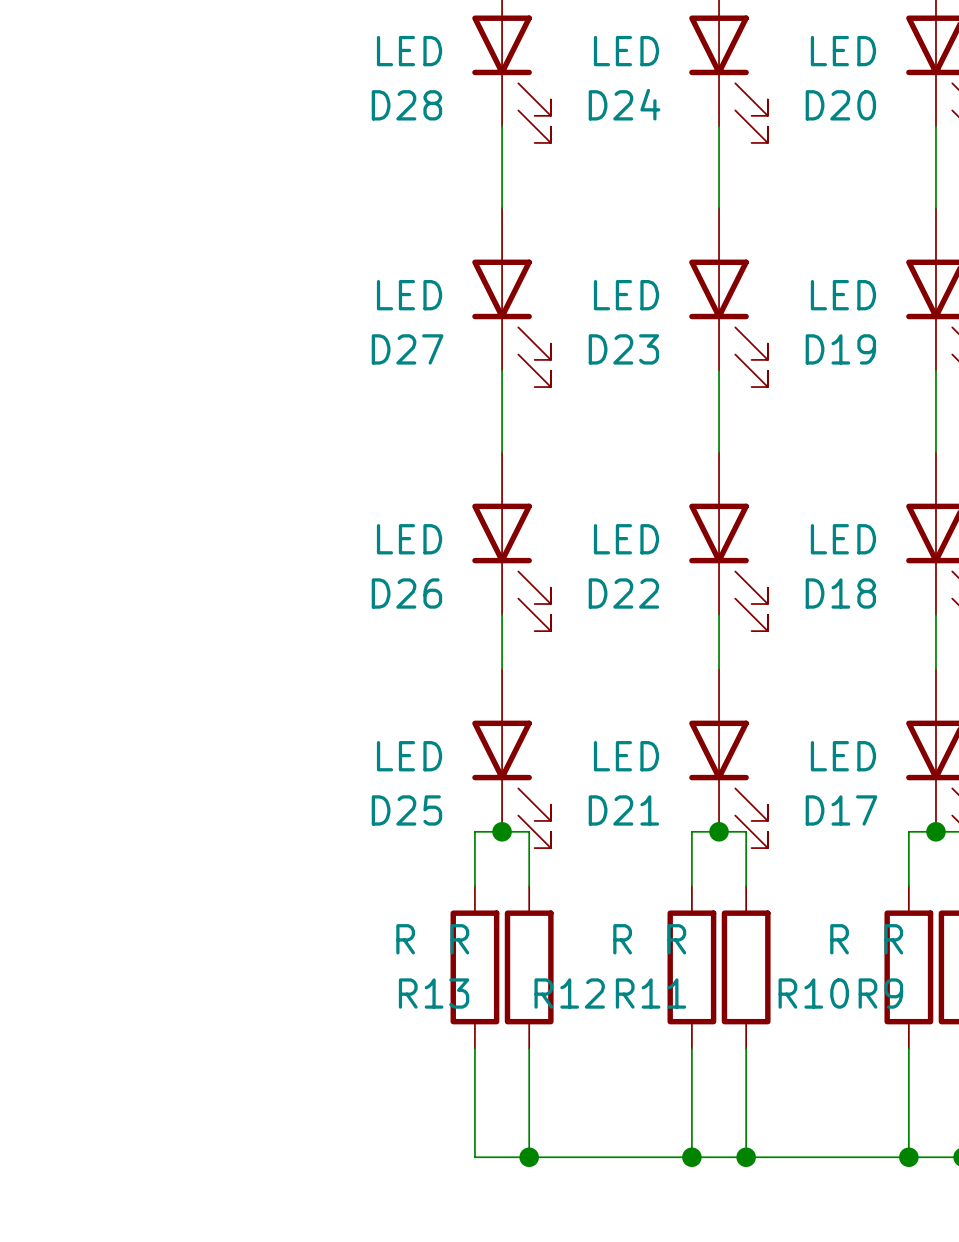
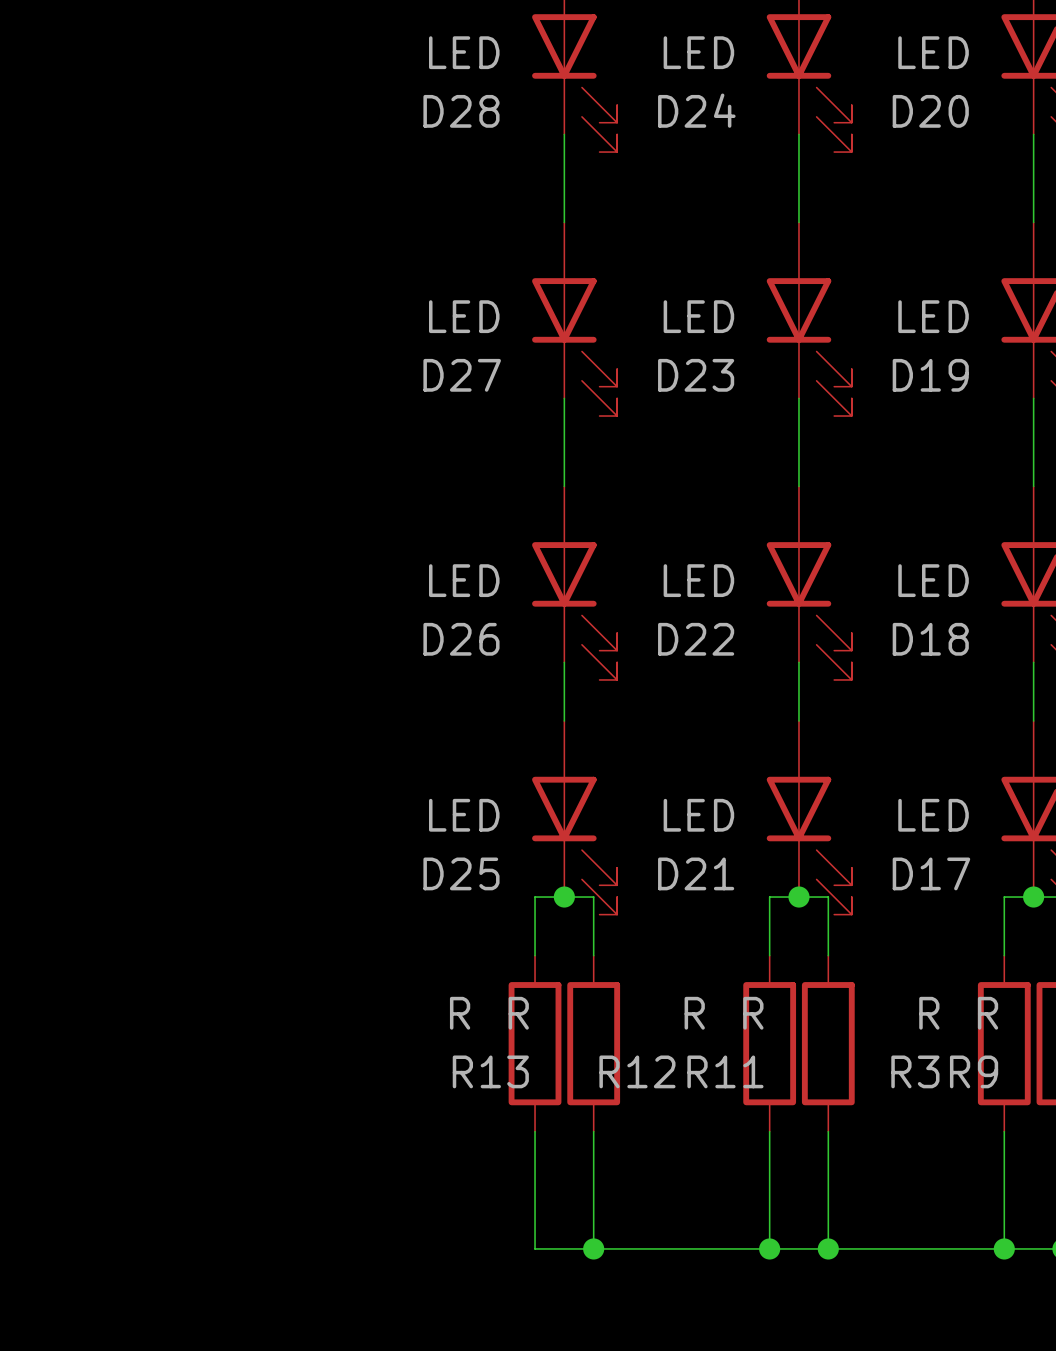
R10 name: R10 (813, 993) -> R3 (915, 1071)

